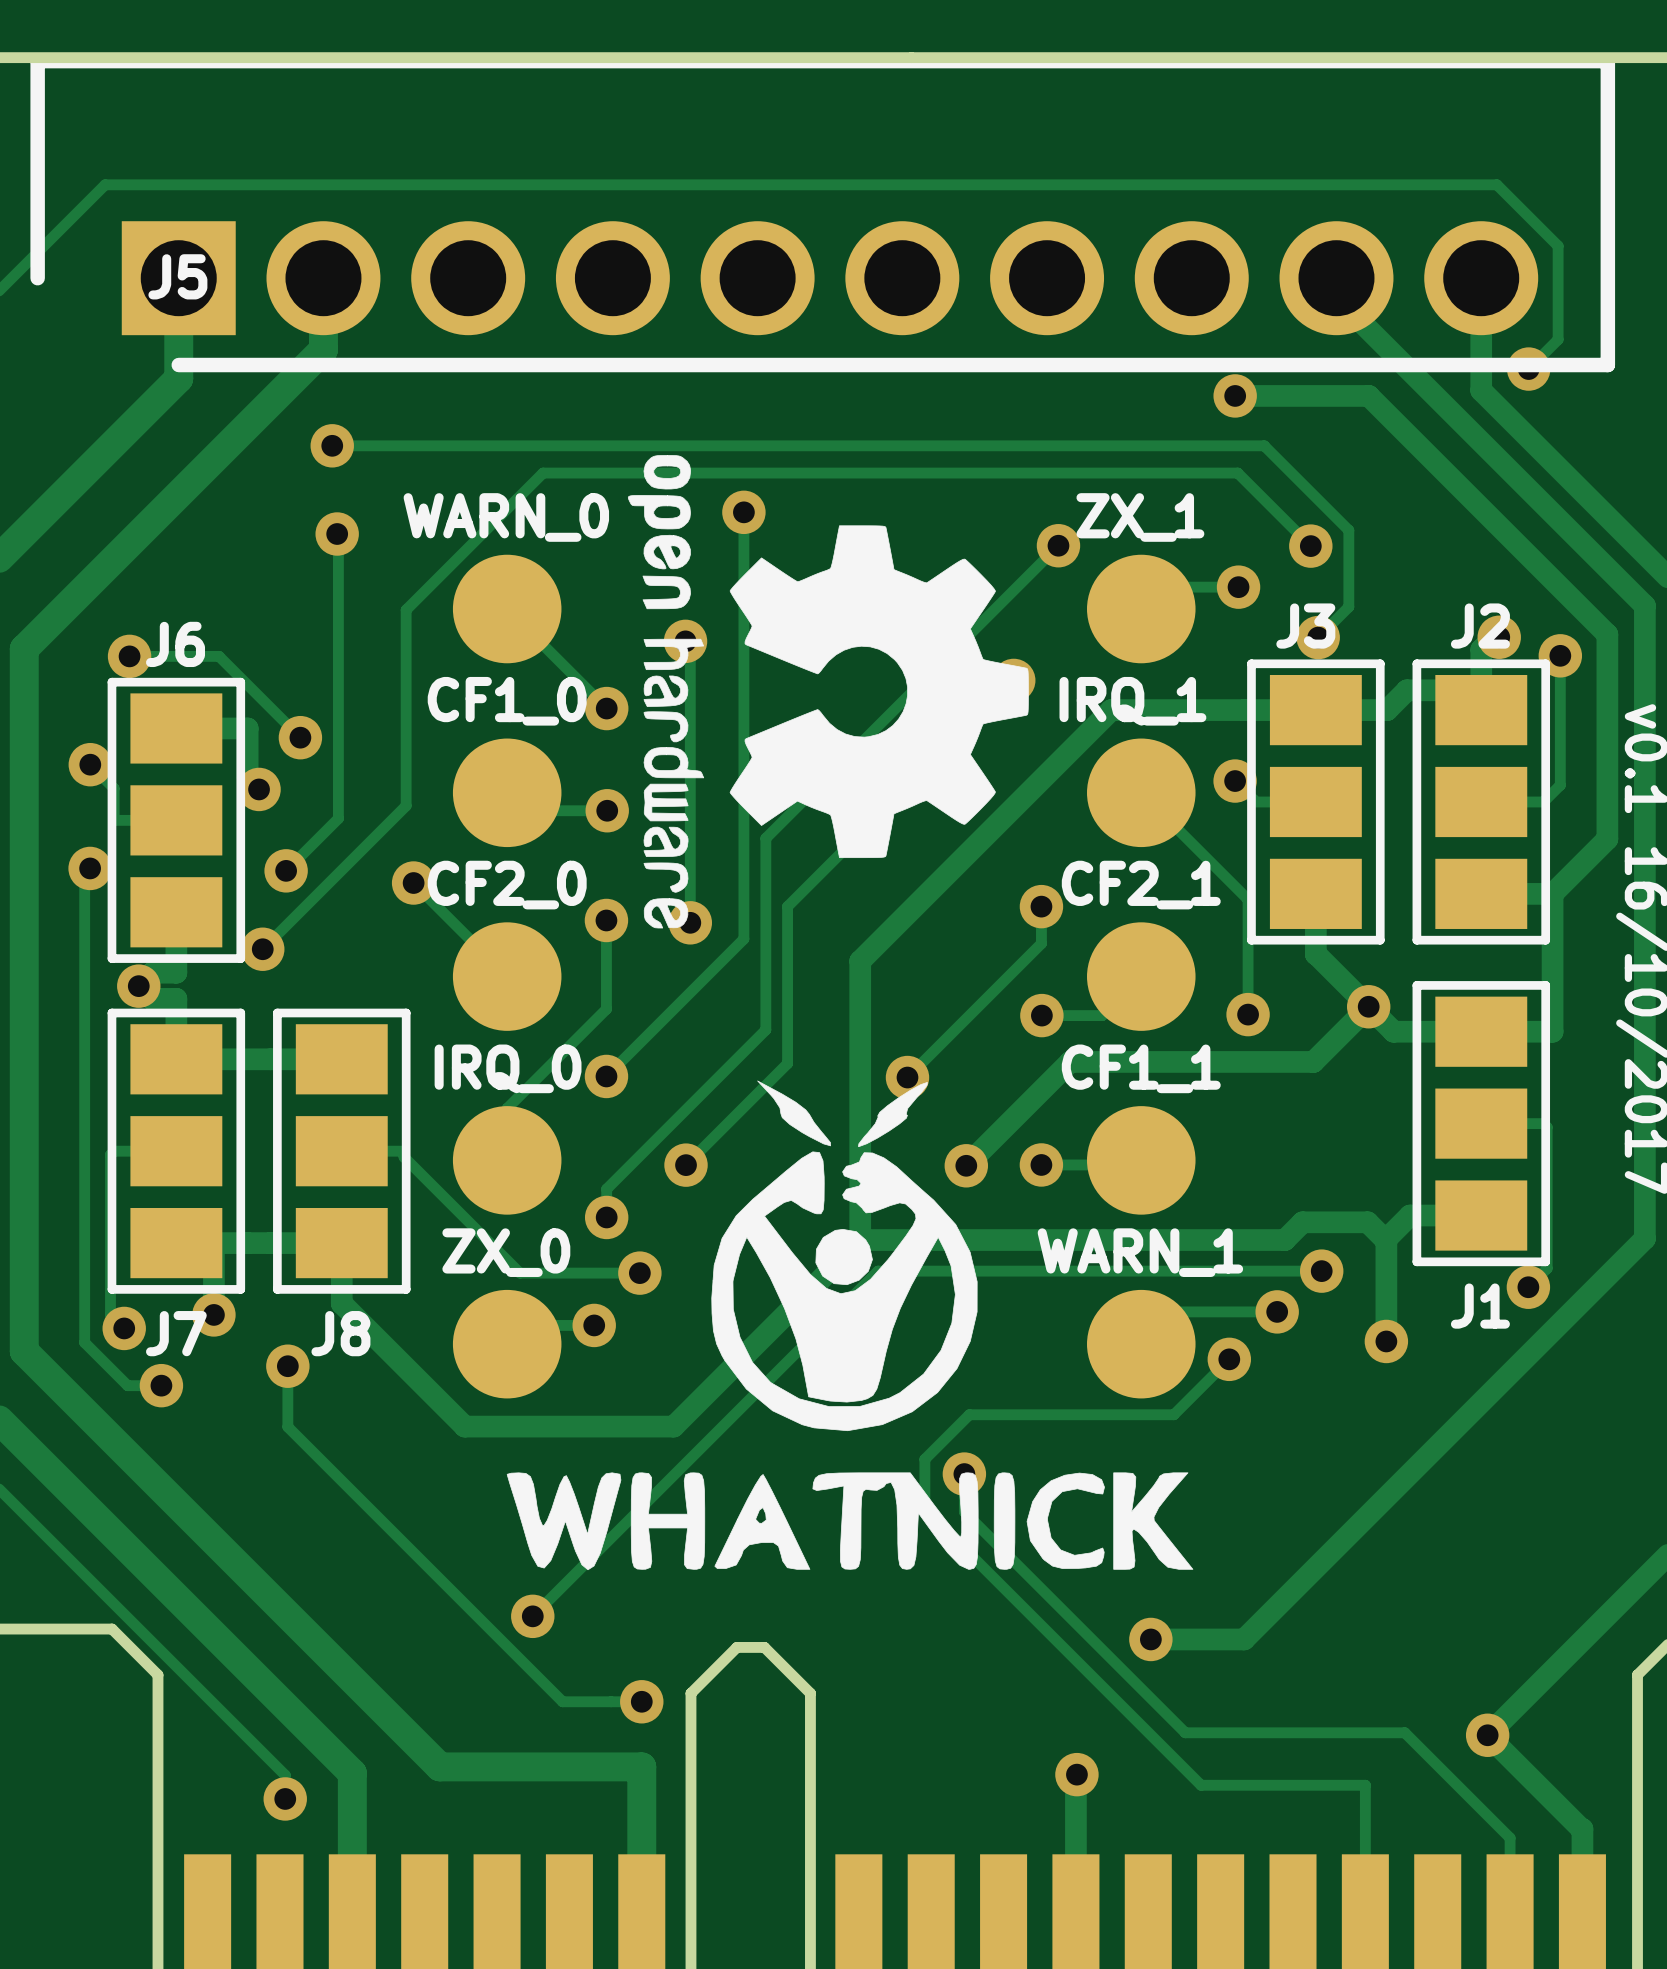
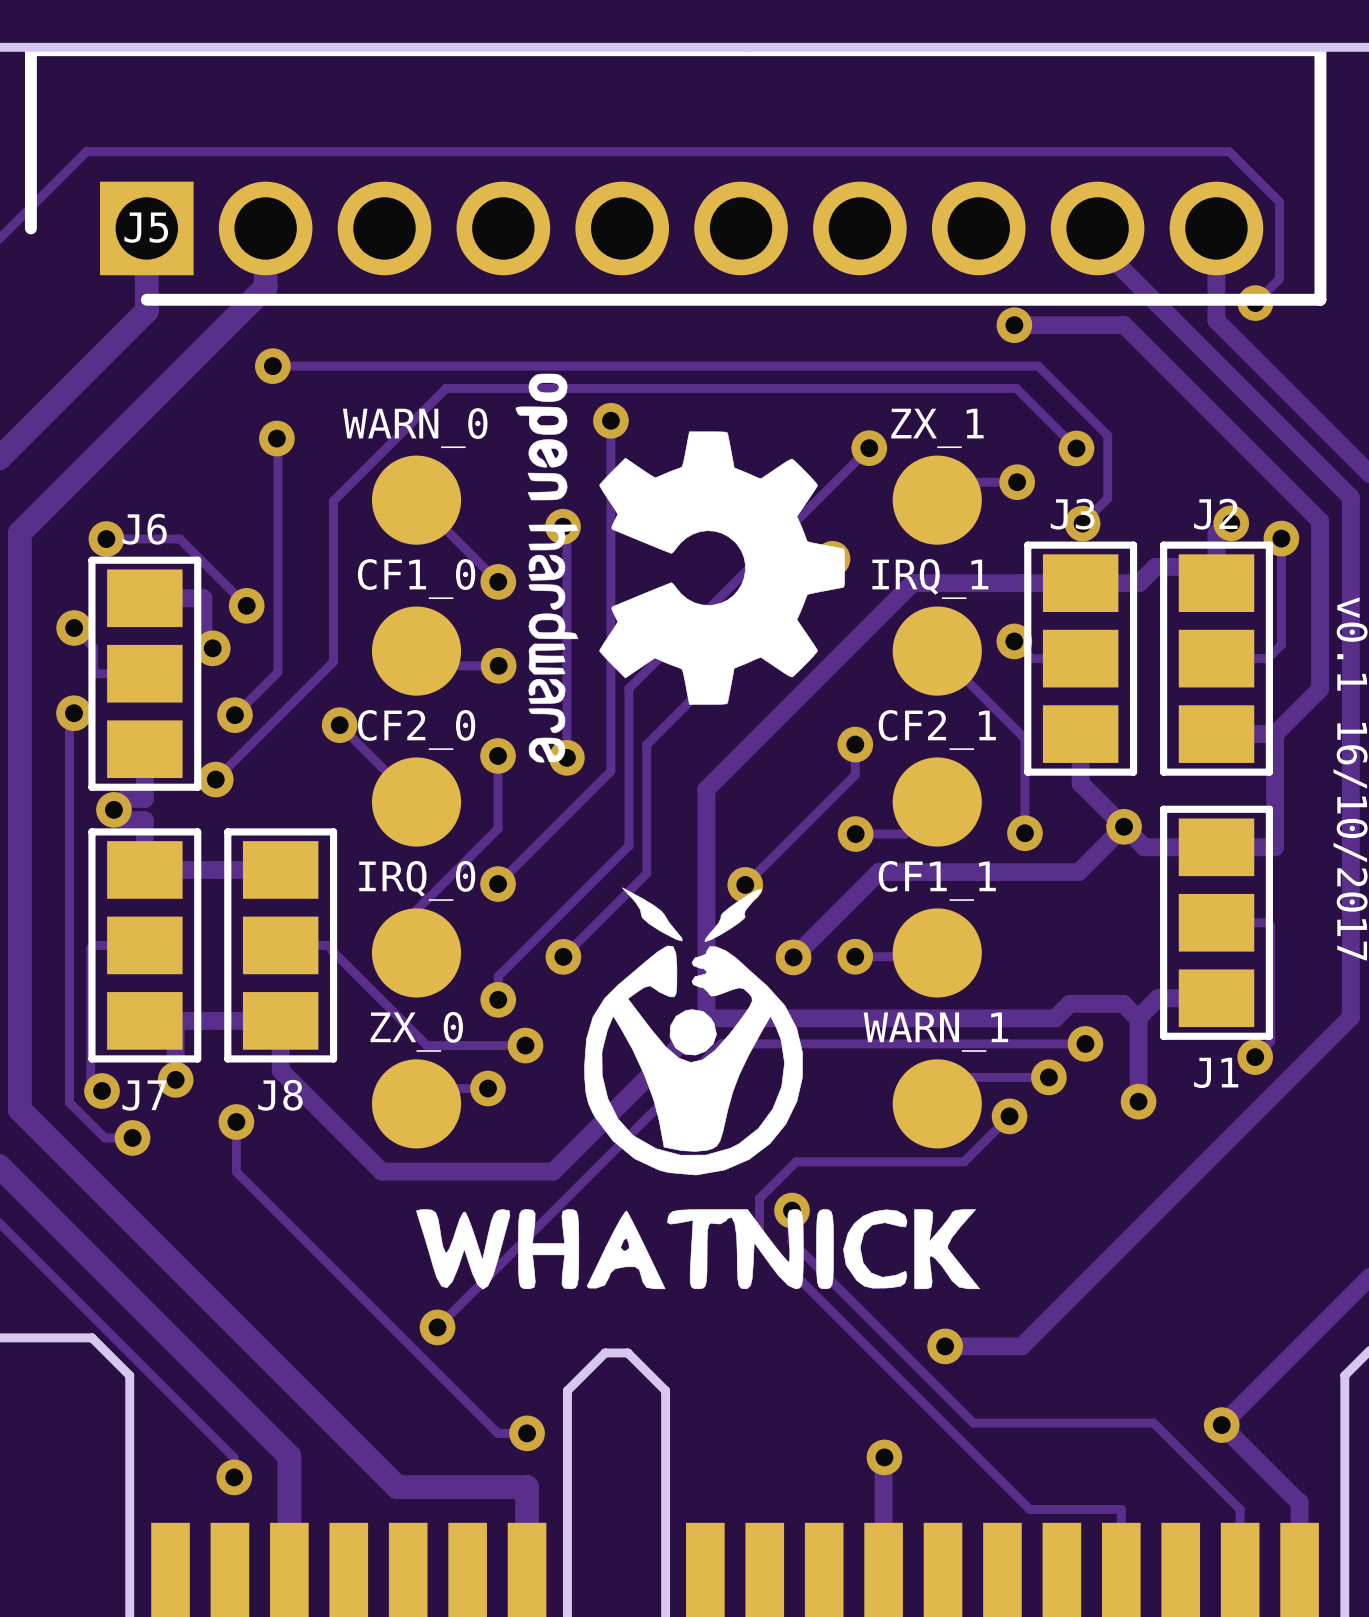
track: (641, 1701) (562, 1701) -> (527, 1433) (497, 1433) (462, 1397)
via position: (641, 1701) -> (527, 1433)
track: (439, 1766) (641, 1766) (641, 1810) -> (361, 1451) (397, 1487) (527, 1487)
track: (1201, 1785) (1365, 1785) (1365, 1838) -> (986, 1466) (1029, 1509) (1121, 1509)

